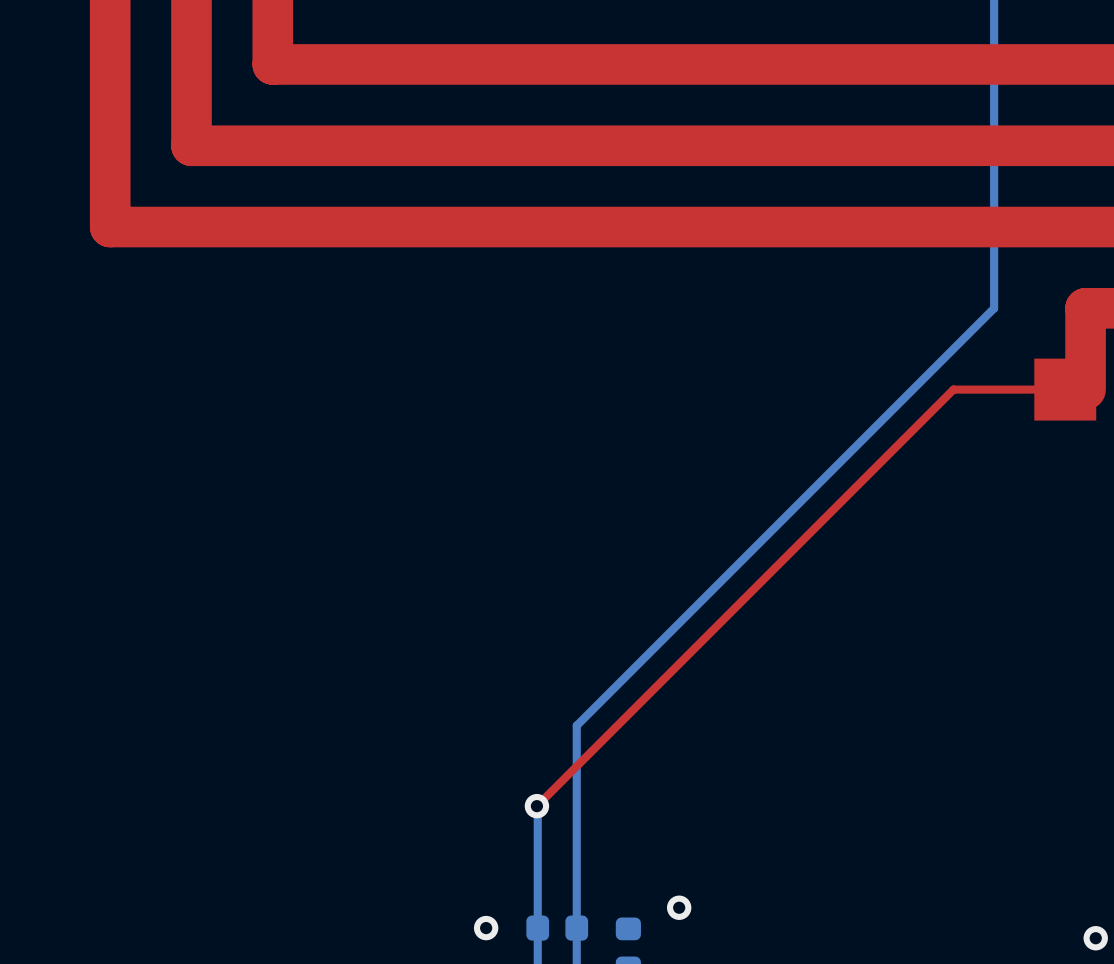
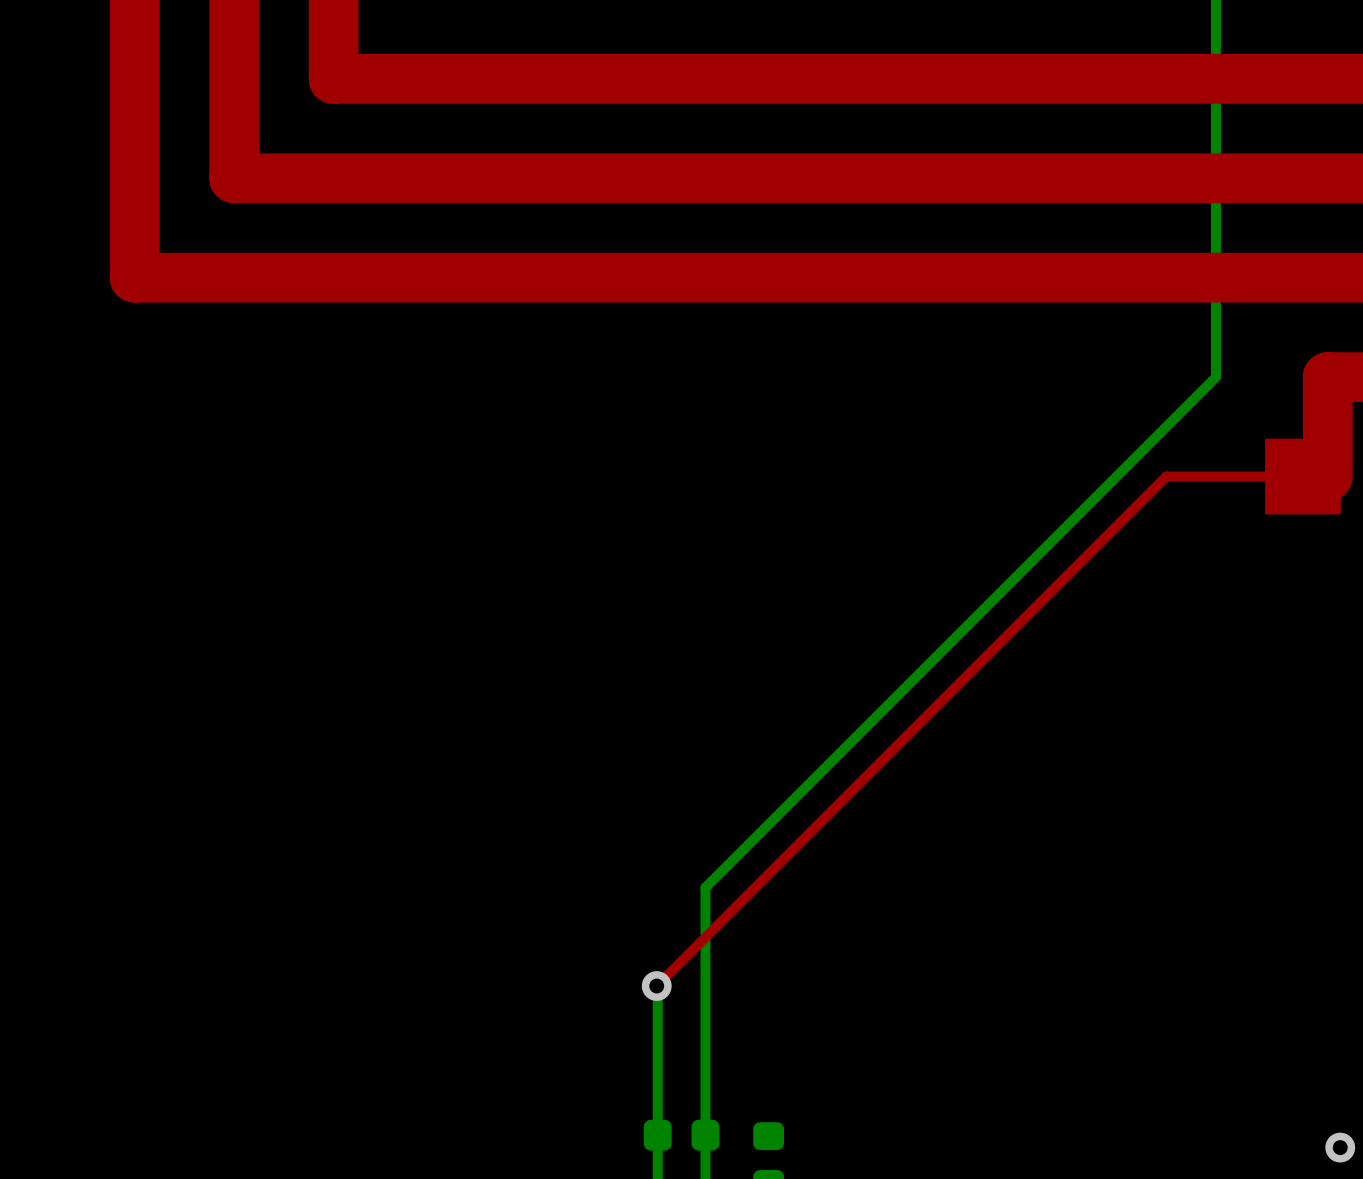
via: (679, 907) -> none
via: (486, 928) -> none

